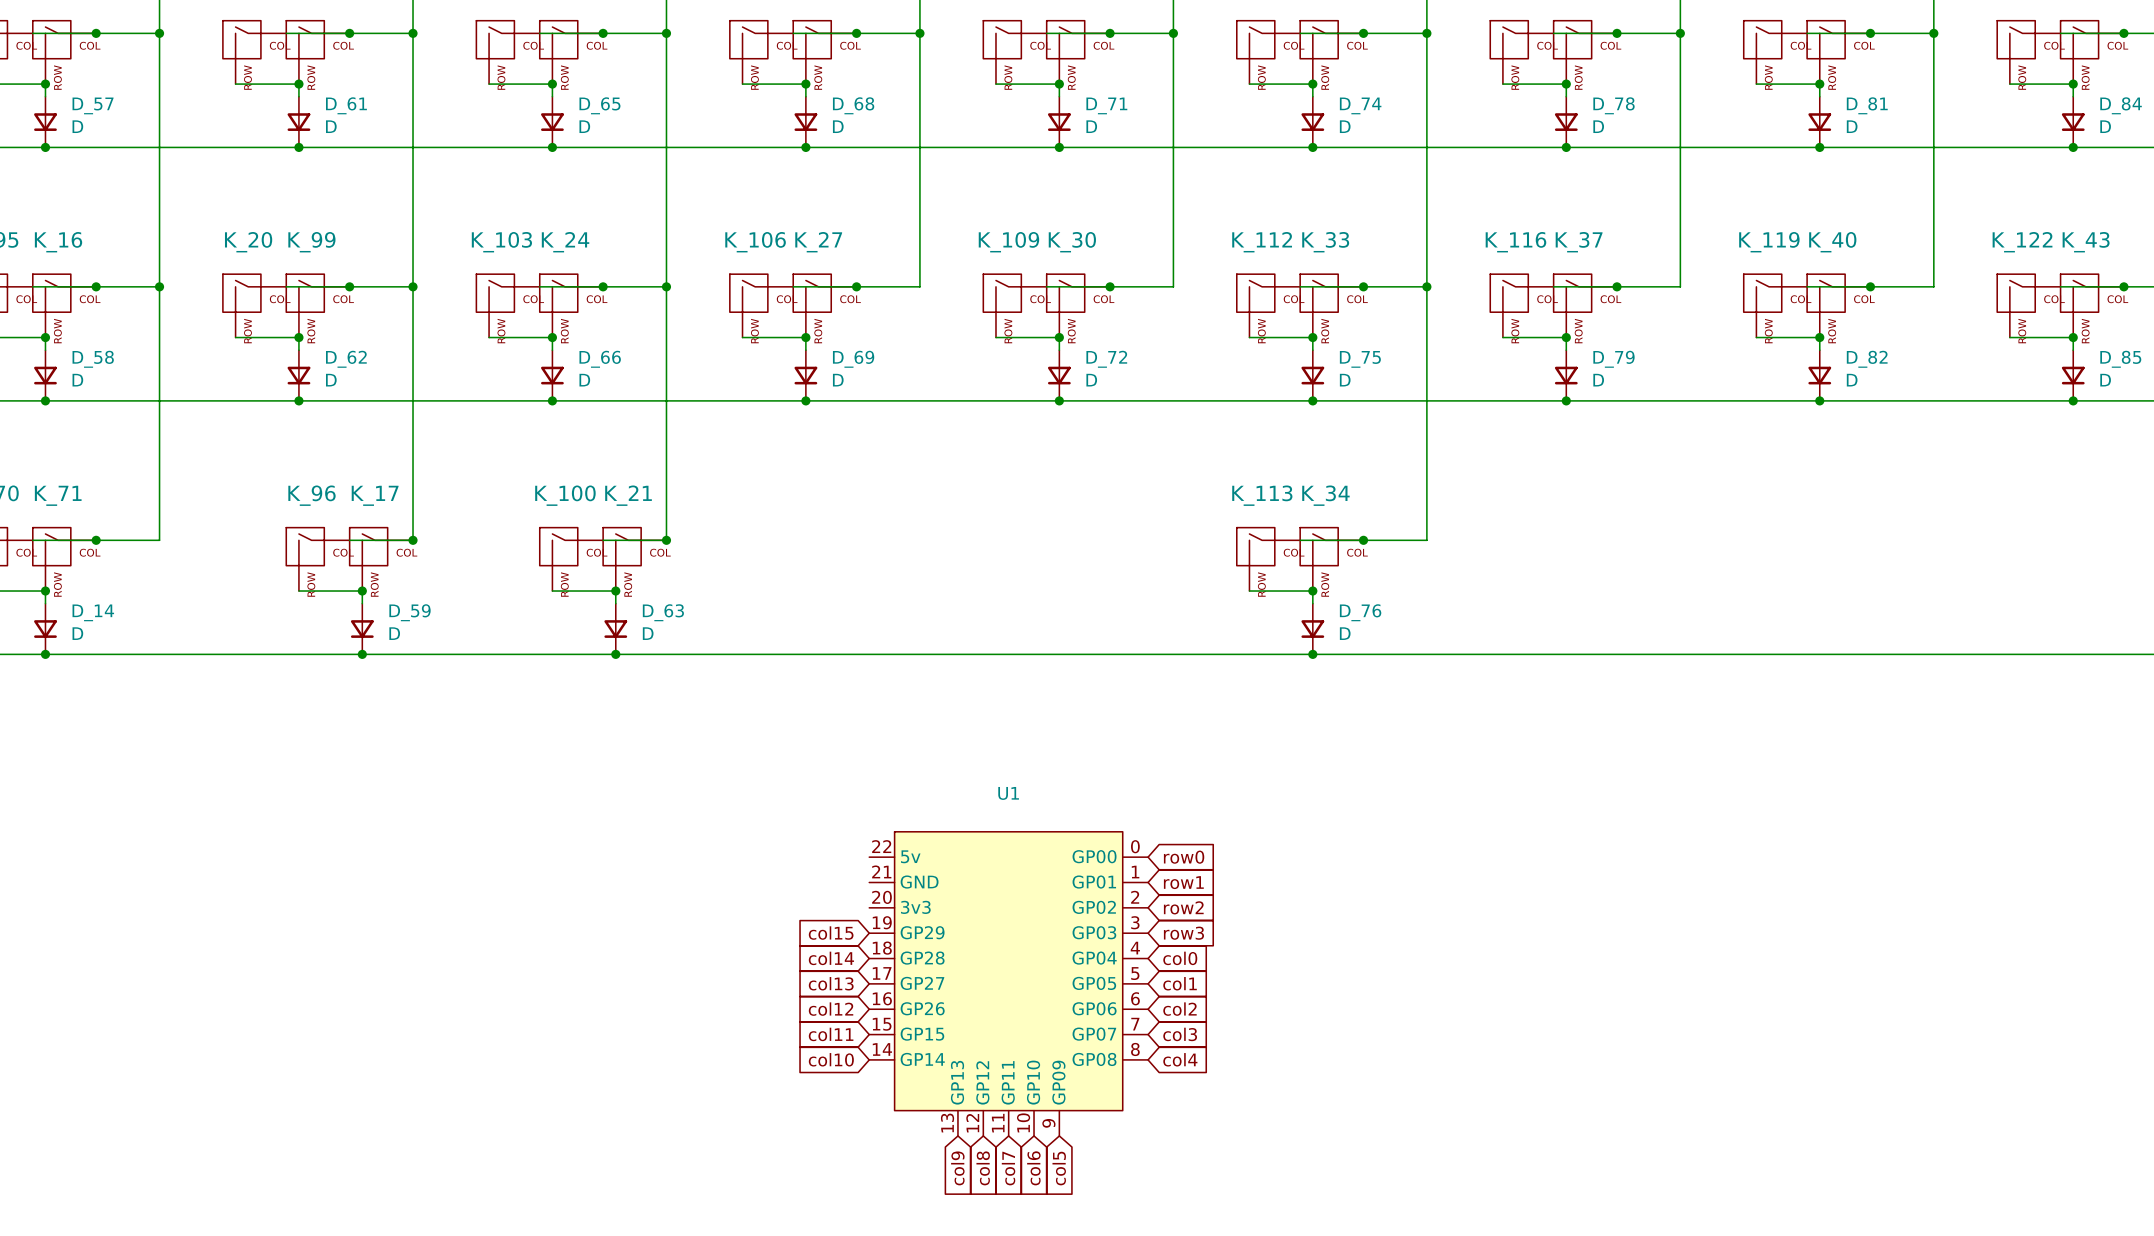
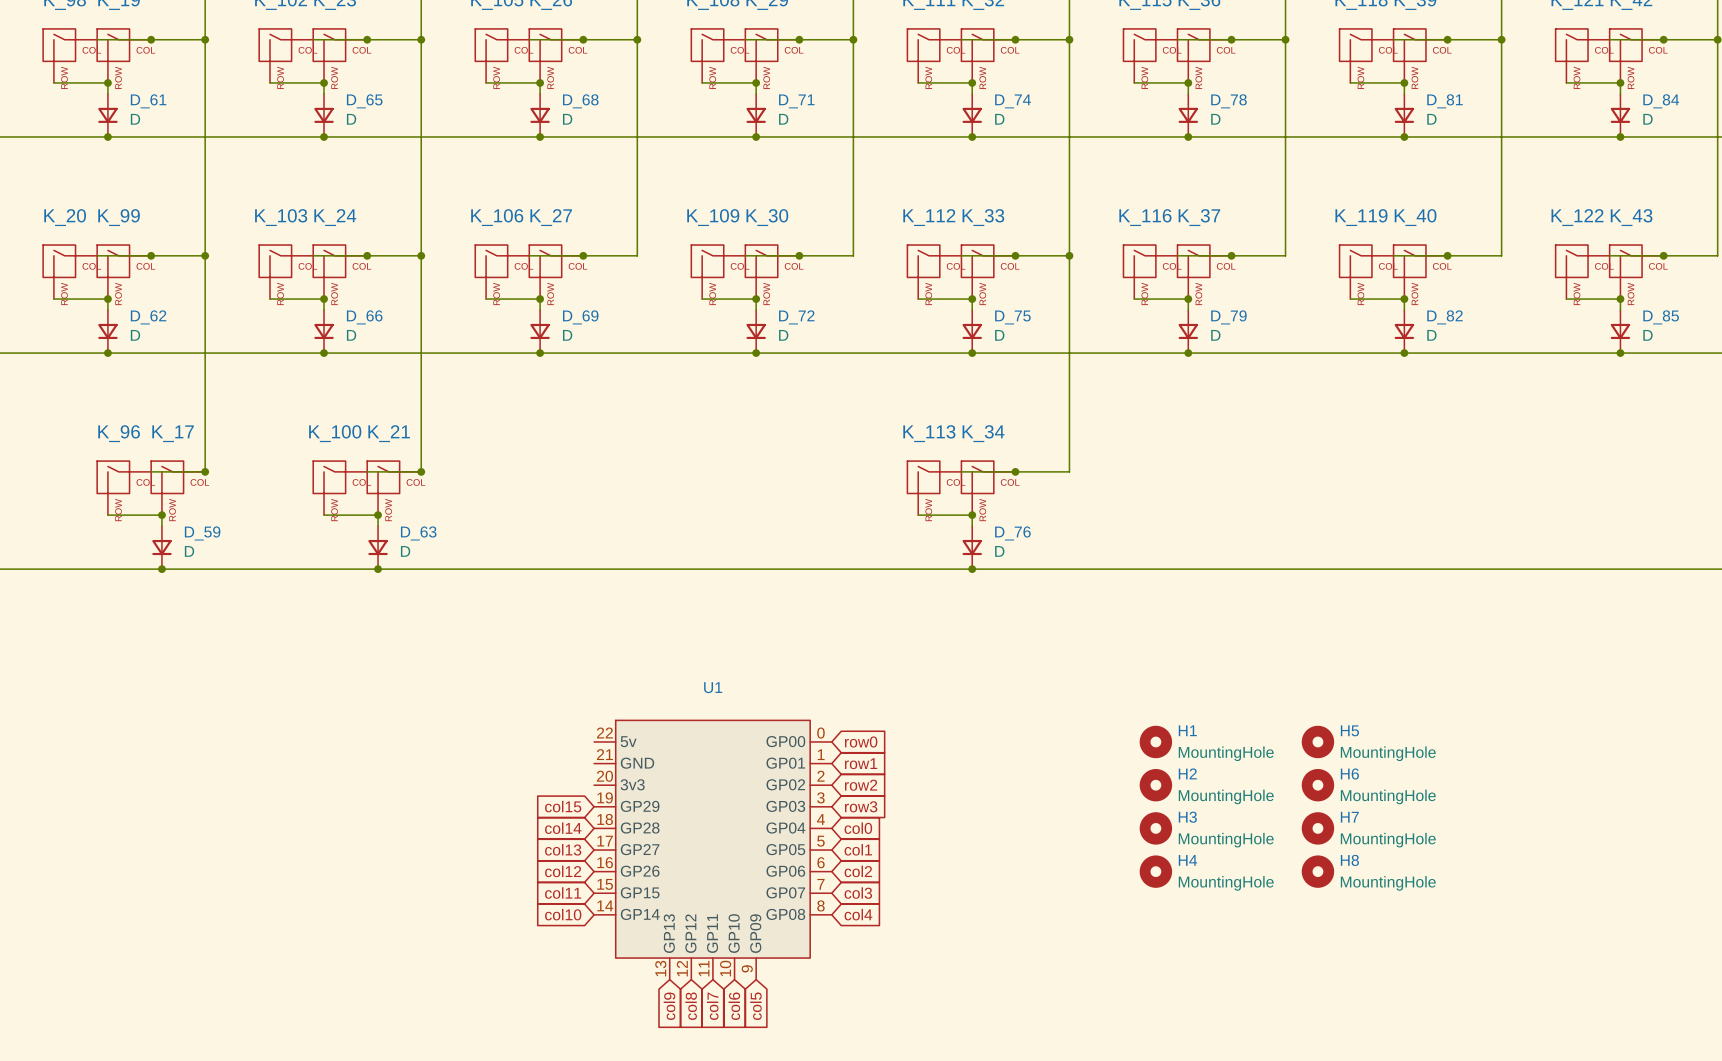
H1: none -> MountingHole (1155, 741)
H5: none -> MountingHole (1317, 741)
H2: none -> MountingHole (1155, 785)
H6: none -> MountingHole (1317, 785)
H3: none -> MountingHole (1155, 828)
H7: none -> MountingHole (1317, 828)
H4: none -> MountingHole (1155, 871)
H8: none -> MountingHole (1317, 871)

